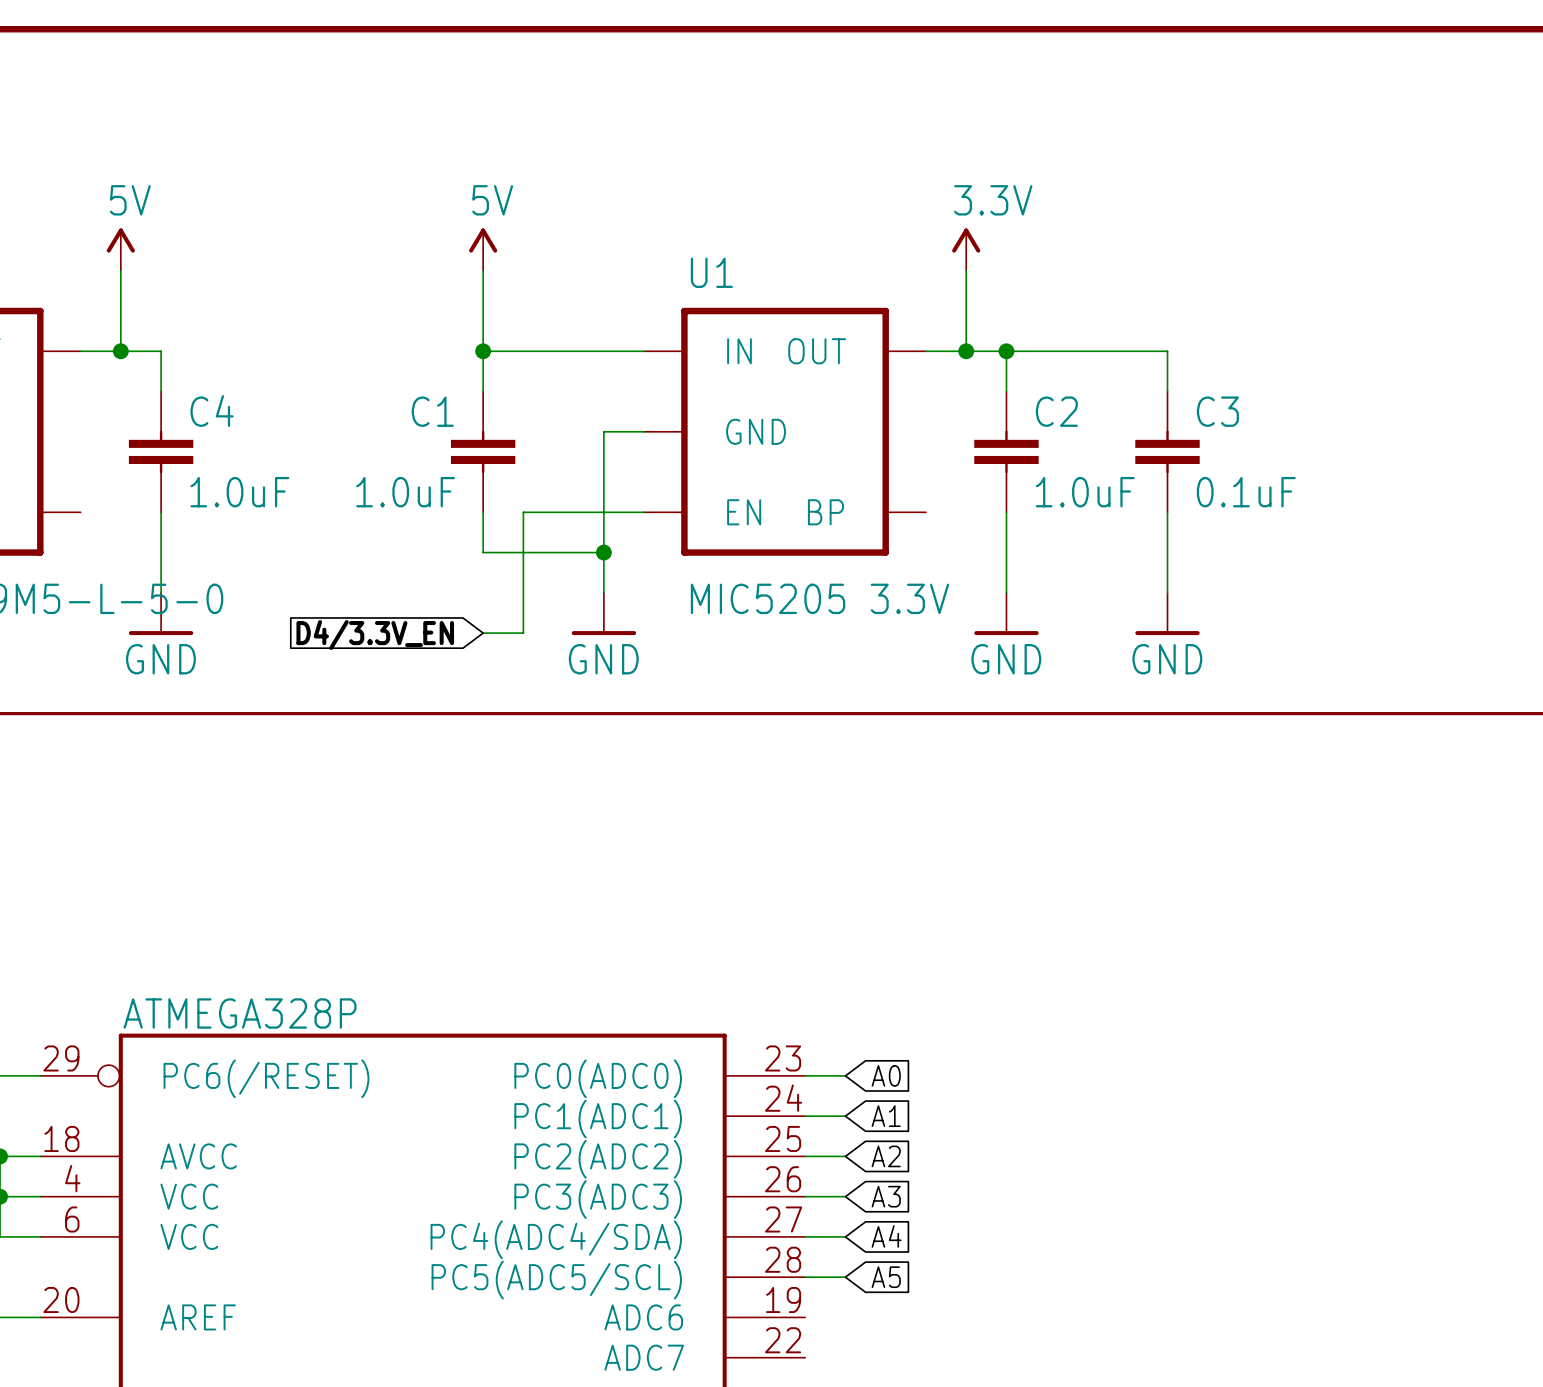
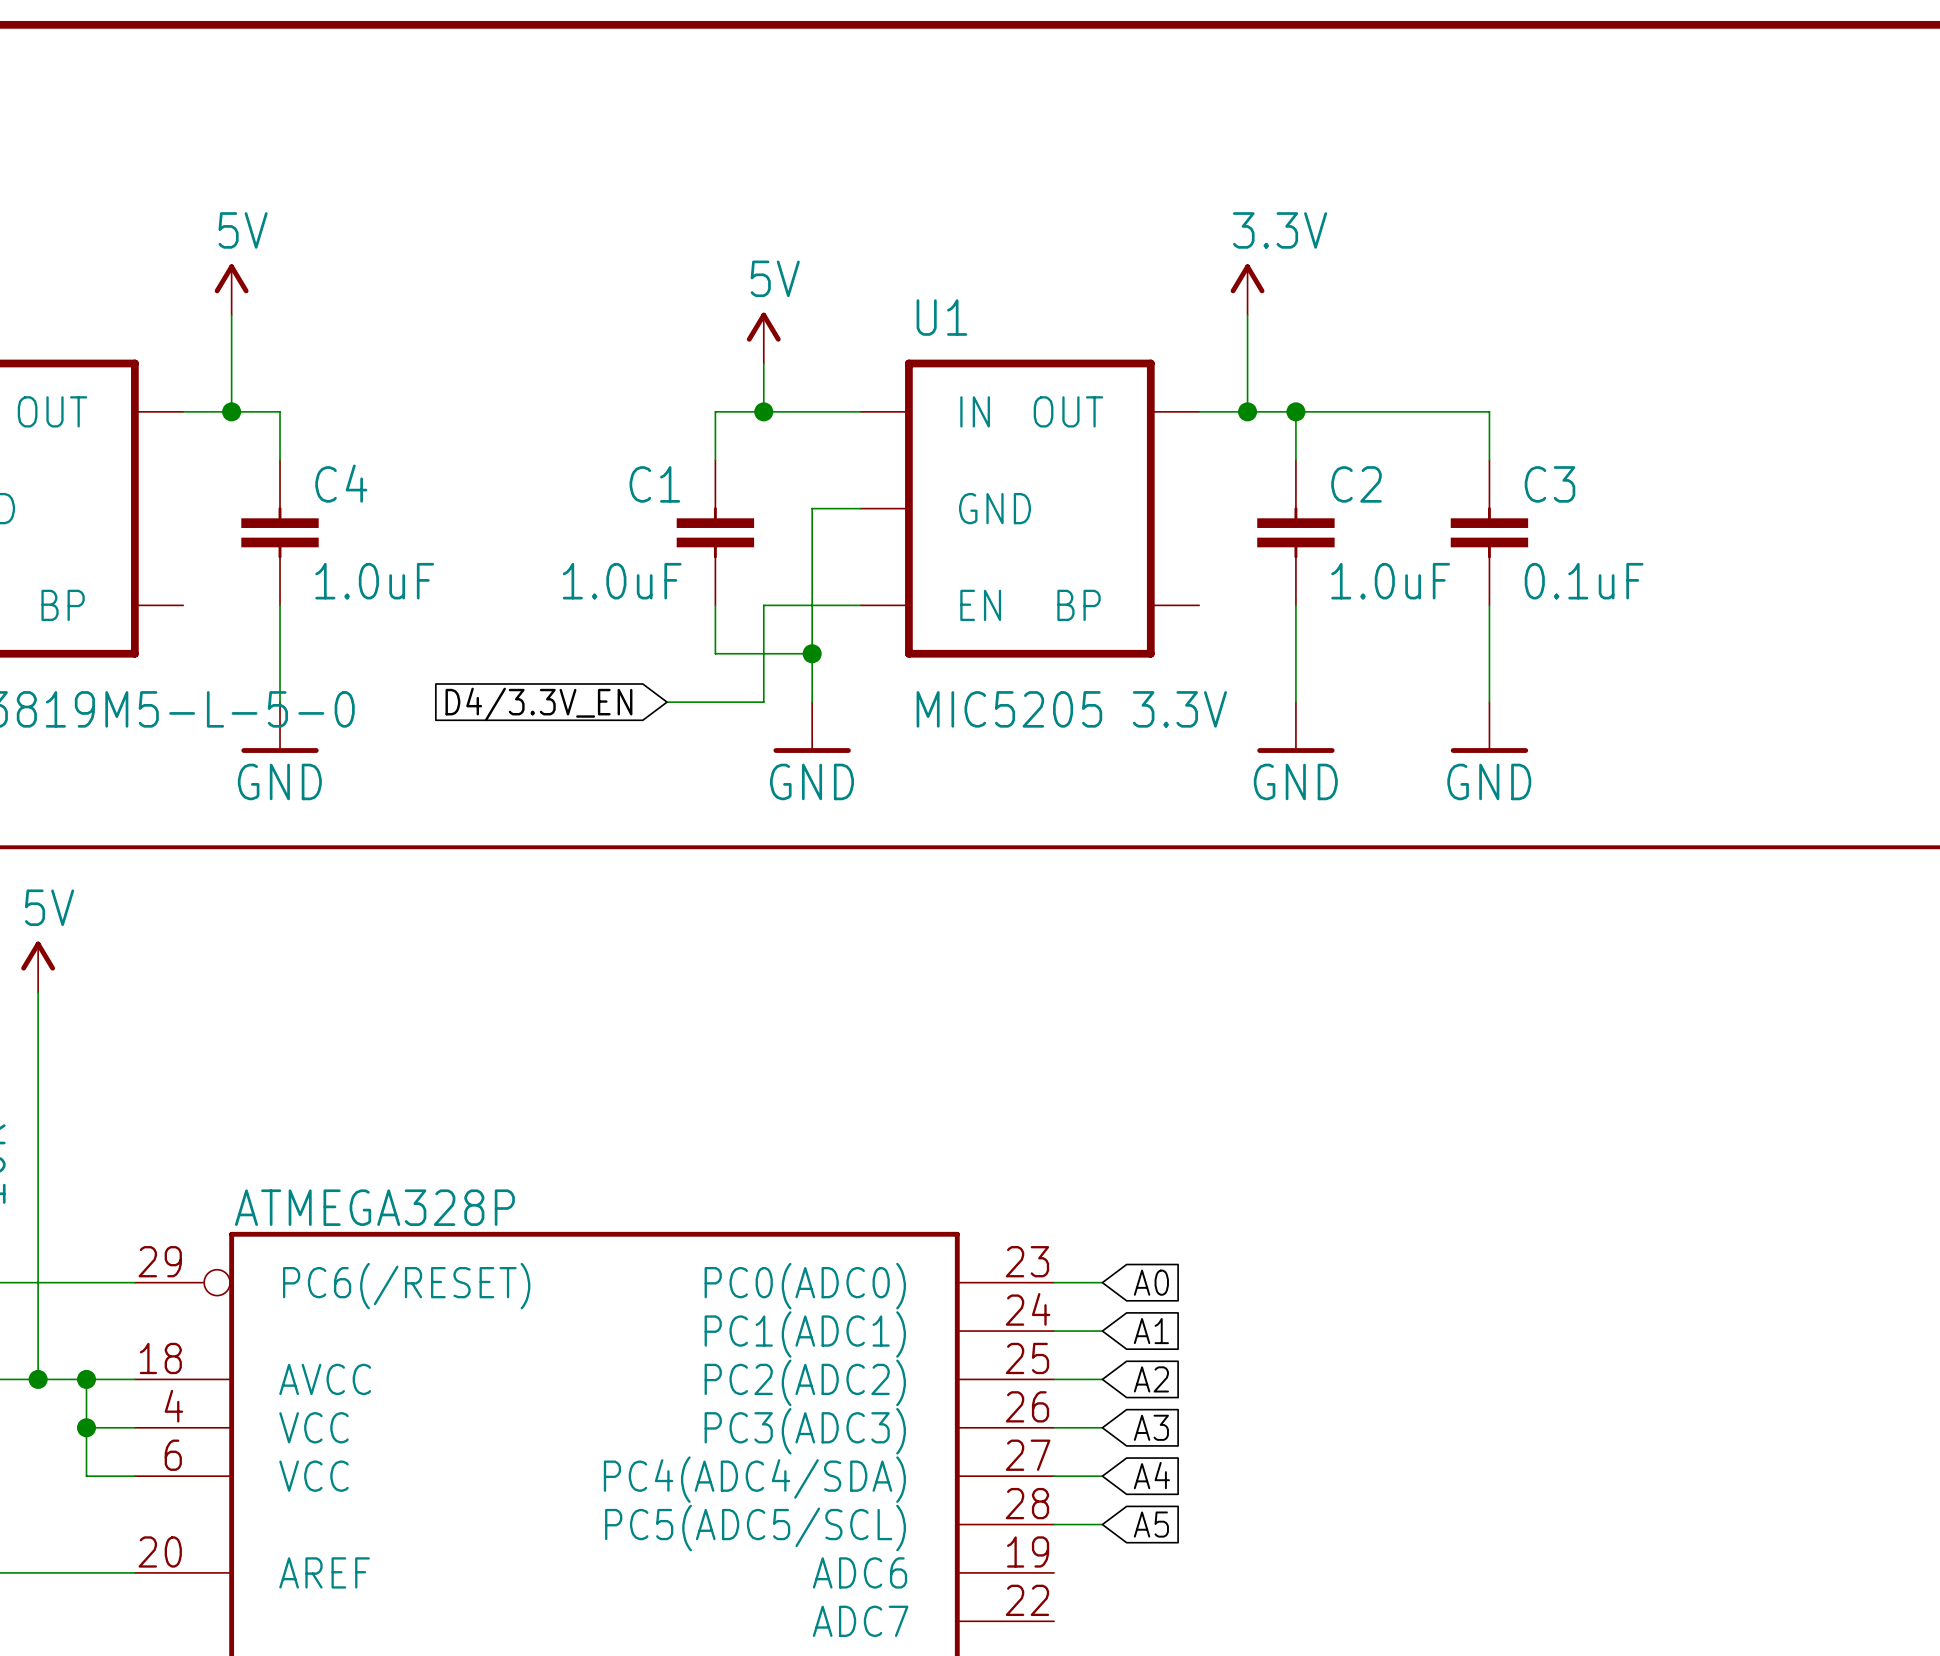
power symbol position: 5V (483, 249) -> 5V (763, 338)
wire: (483, 270) (483, 391) -> none
wire: none -> (763, 363) (763, 411)
wire: (483, 351) (523, 351) -> (715, 460) (715, 411)
junction position: (483, 351) -> (763, 411)
C1 position: (483, 451) -> (715, 532)
wire: (483, 512) (483, 552) (523, 552) (523, 633) (483, 633) -> none
wire: (523, 512) (563, 512) -> (667, 702) (763, 702) (763, 605)
global label position: D4/3.3V_EN (375, 634) -> D4/3.3V_EN (538, 704)

